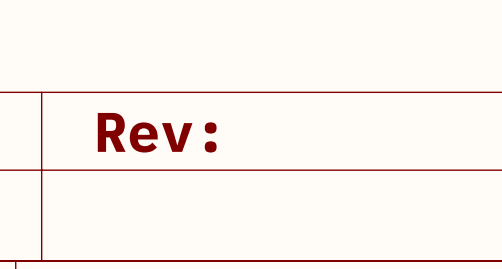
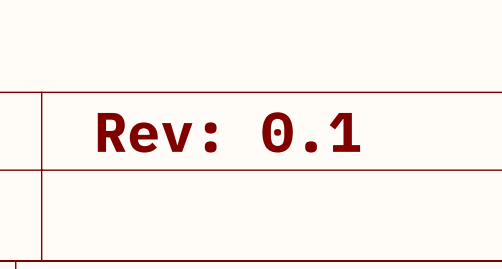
title block: Rev: (157, 132) -> Rev: 0.1 (228, 132)

